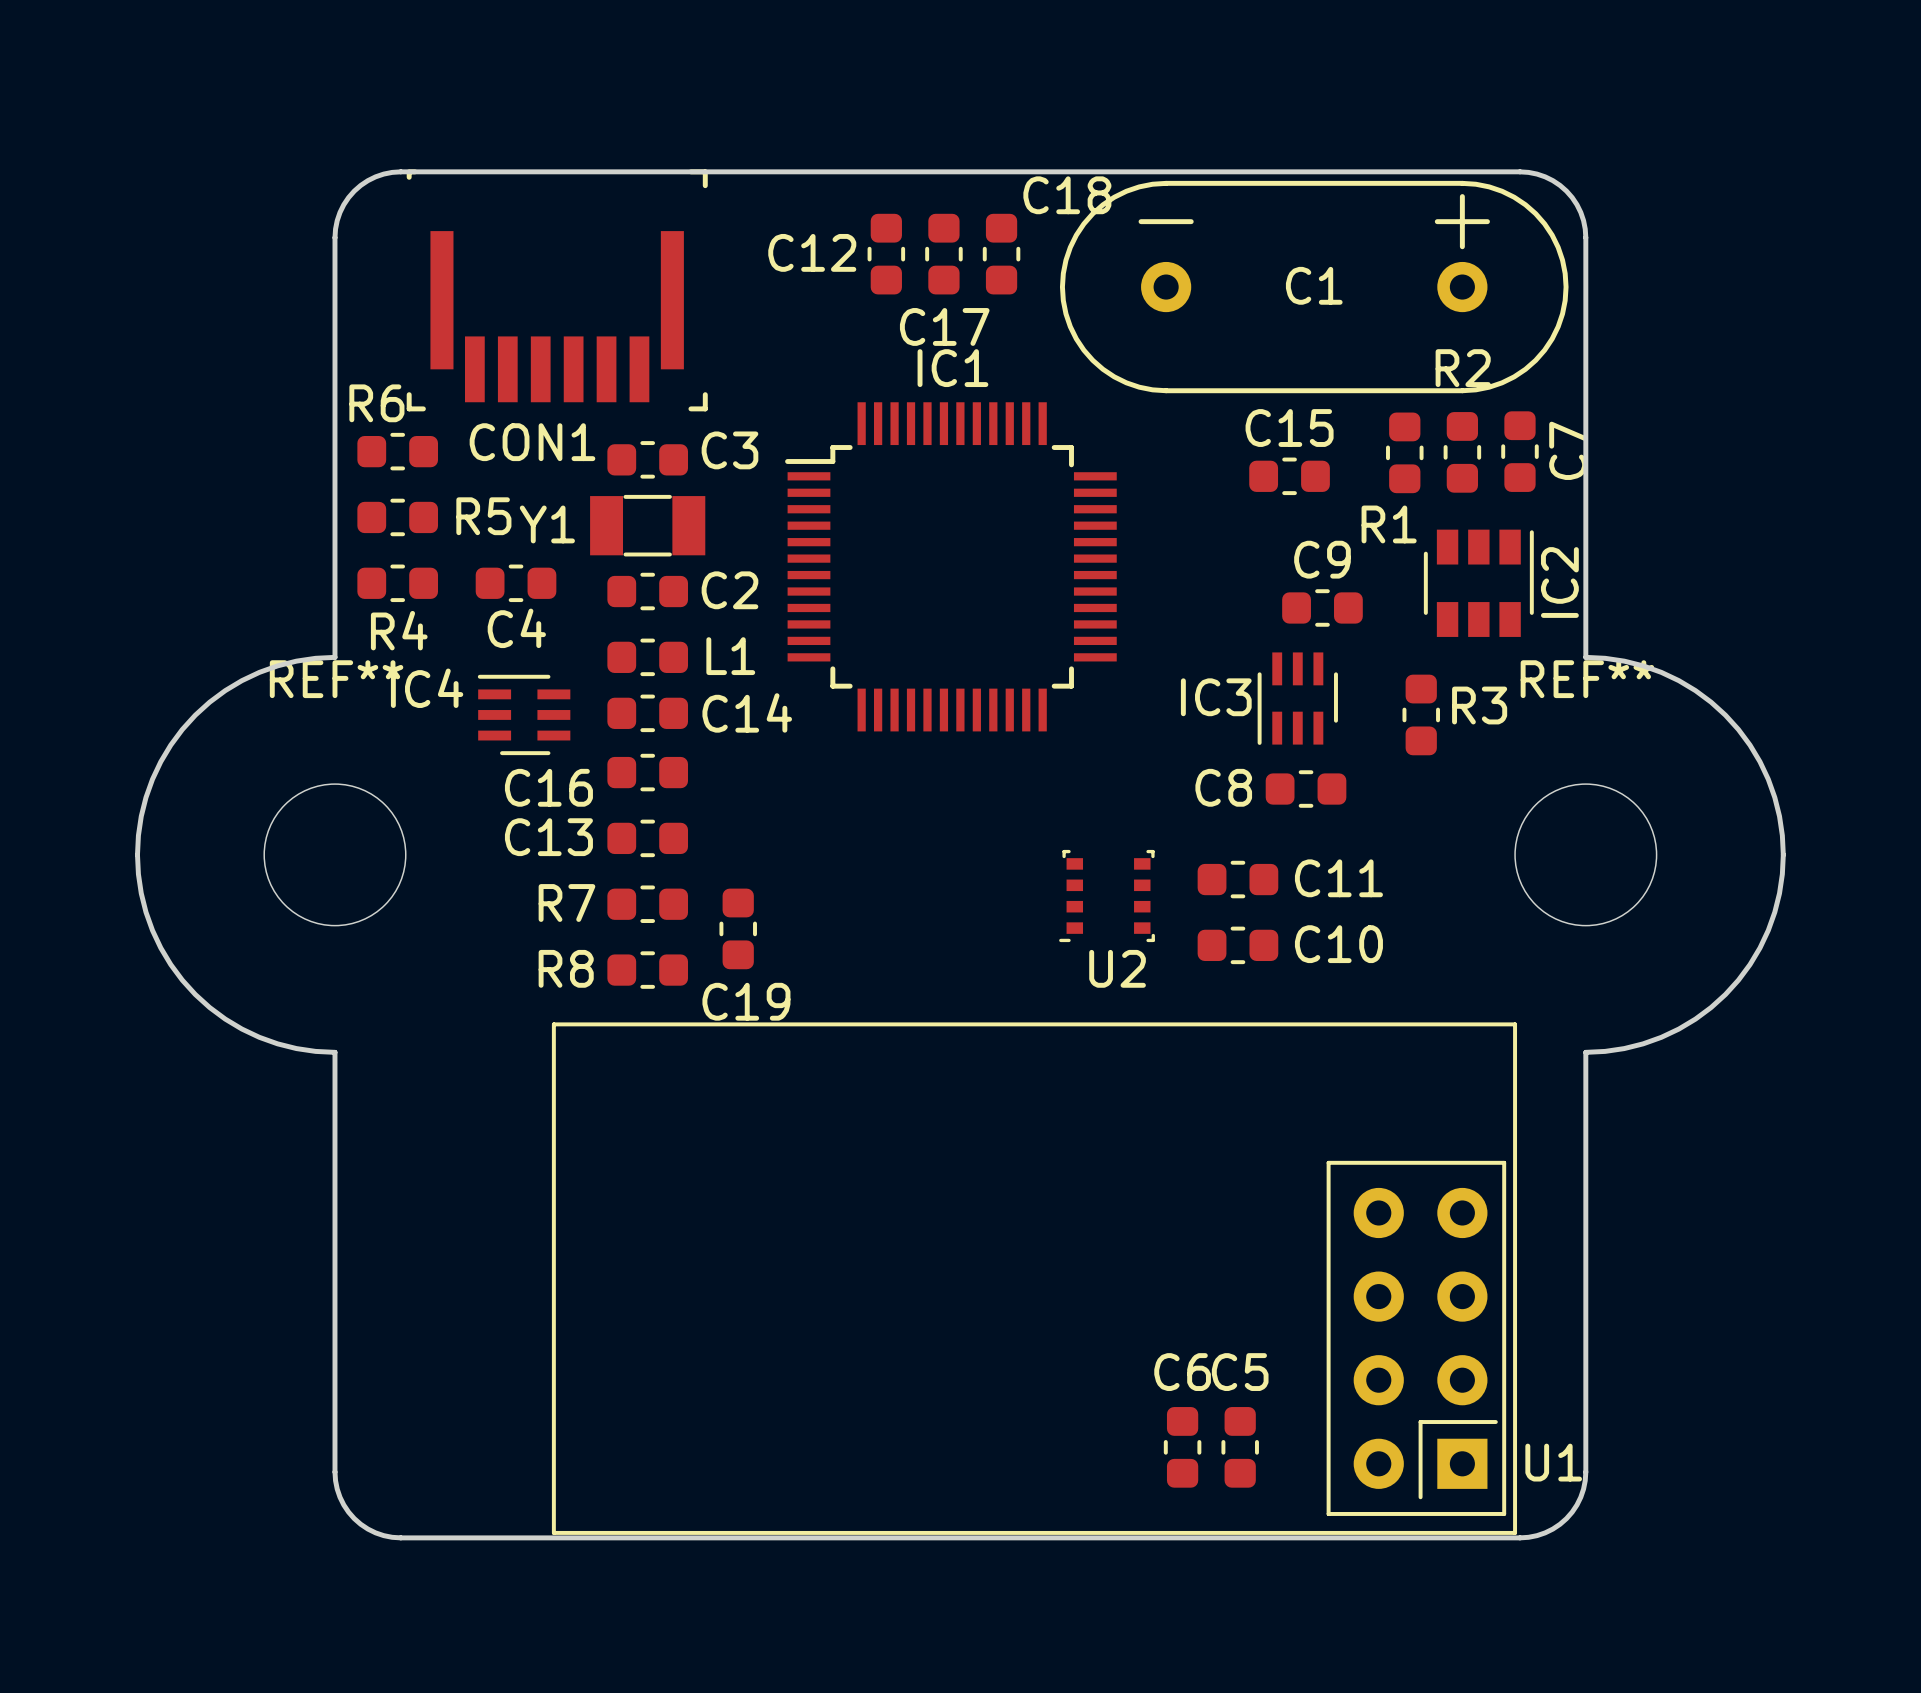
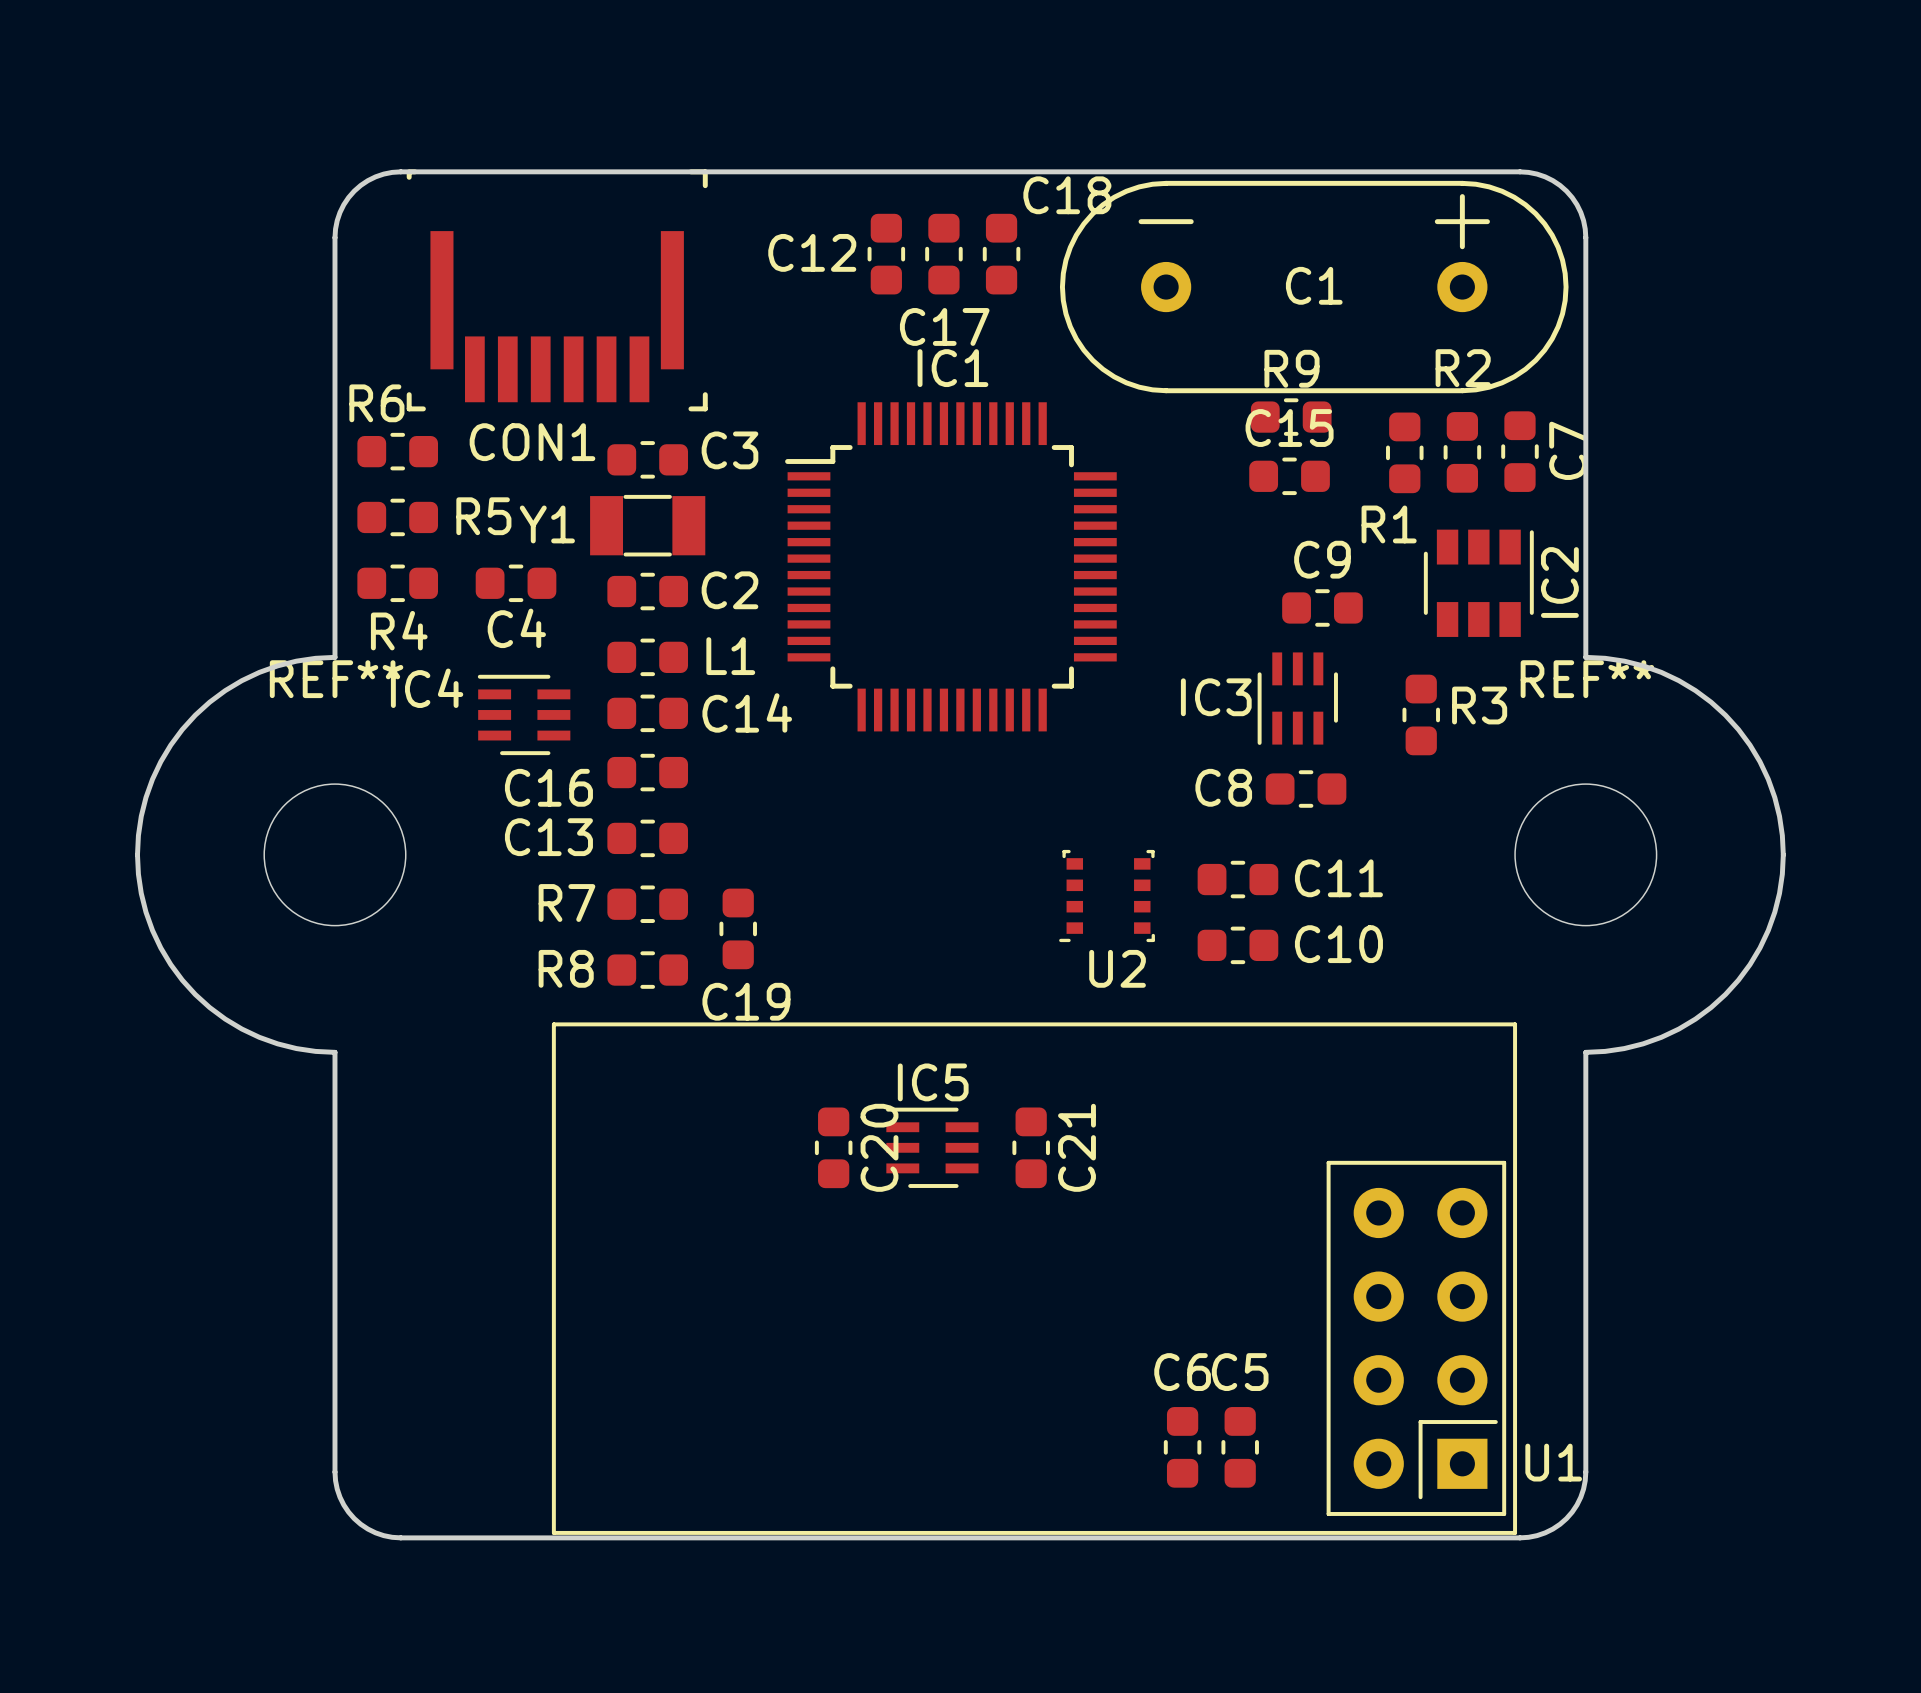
R9: none -> (1291, 417)
C20: none -> (833, 1147)
IC5: none -> (932, 1147)
C21: none -> (1031, 1147)

